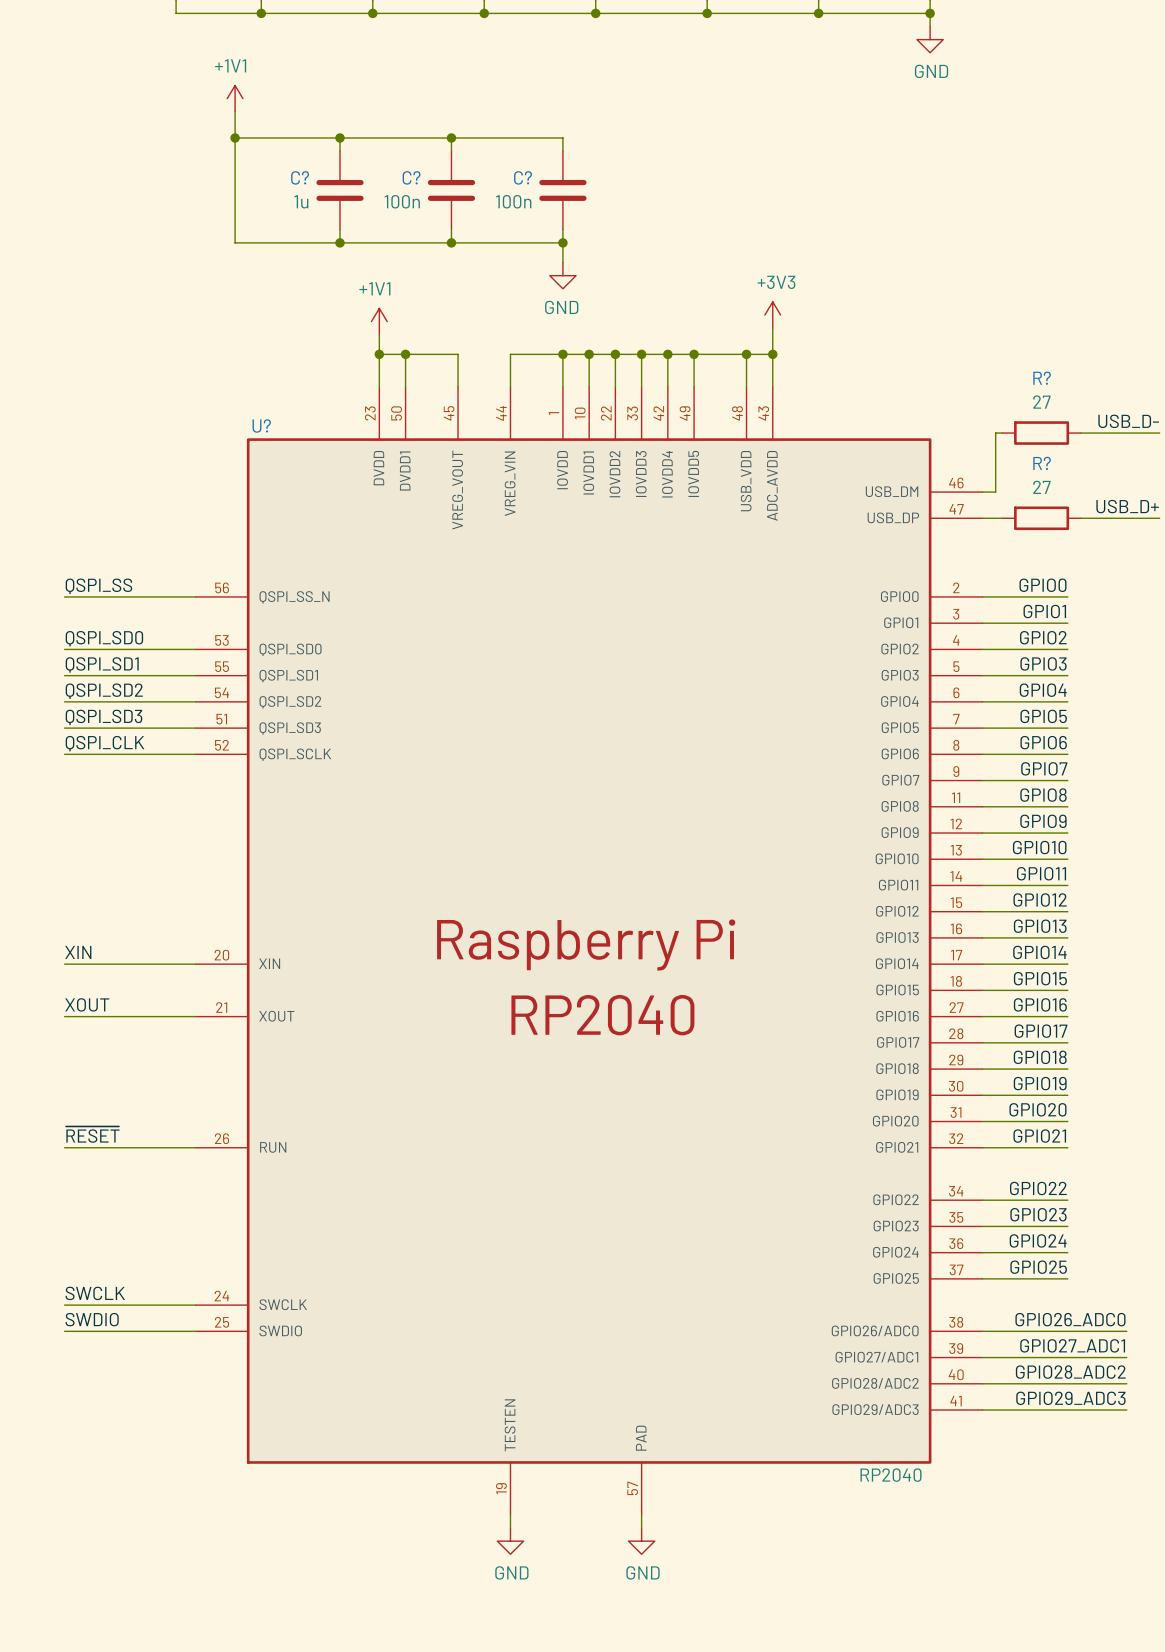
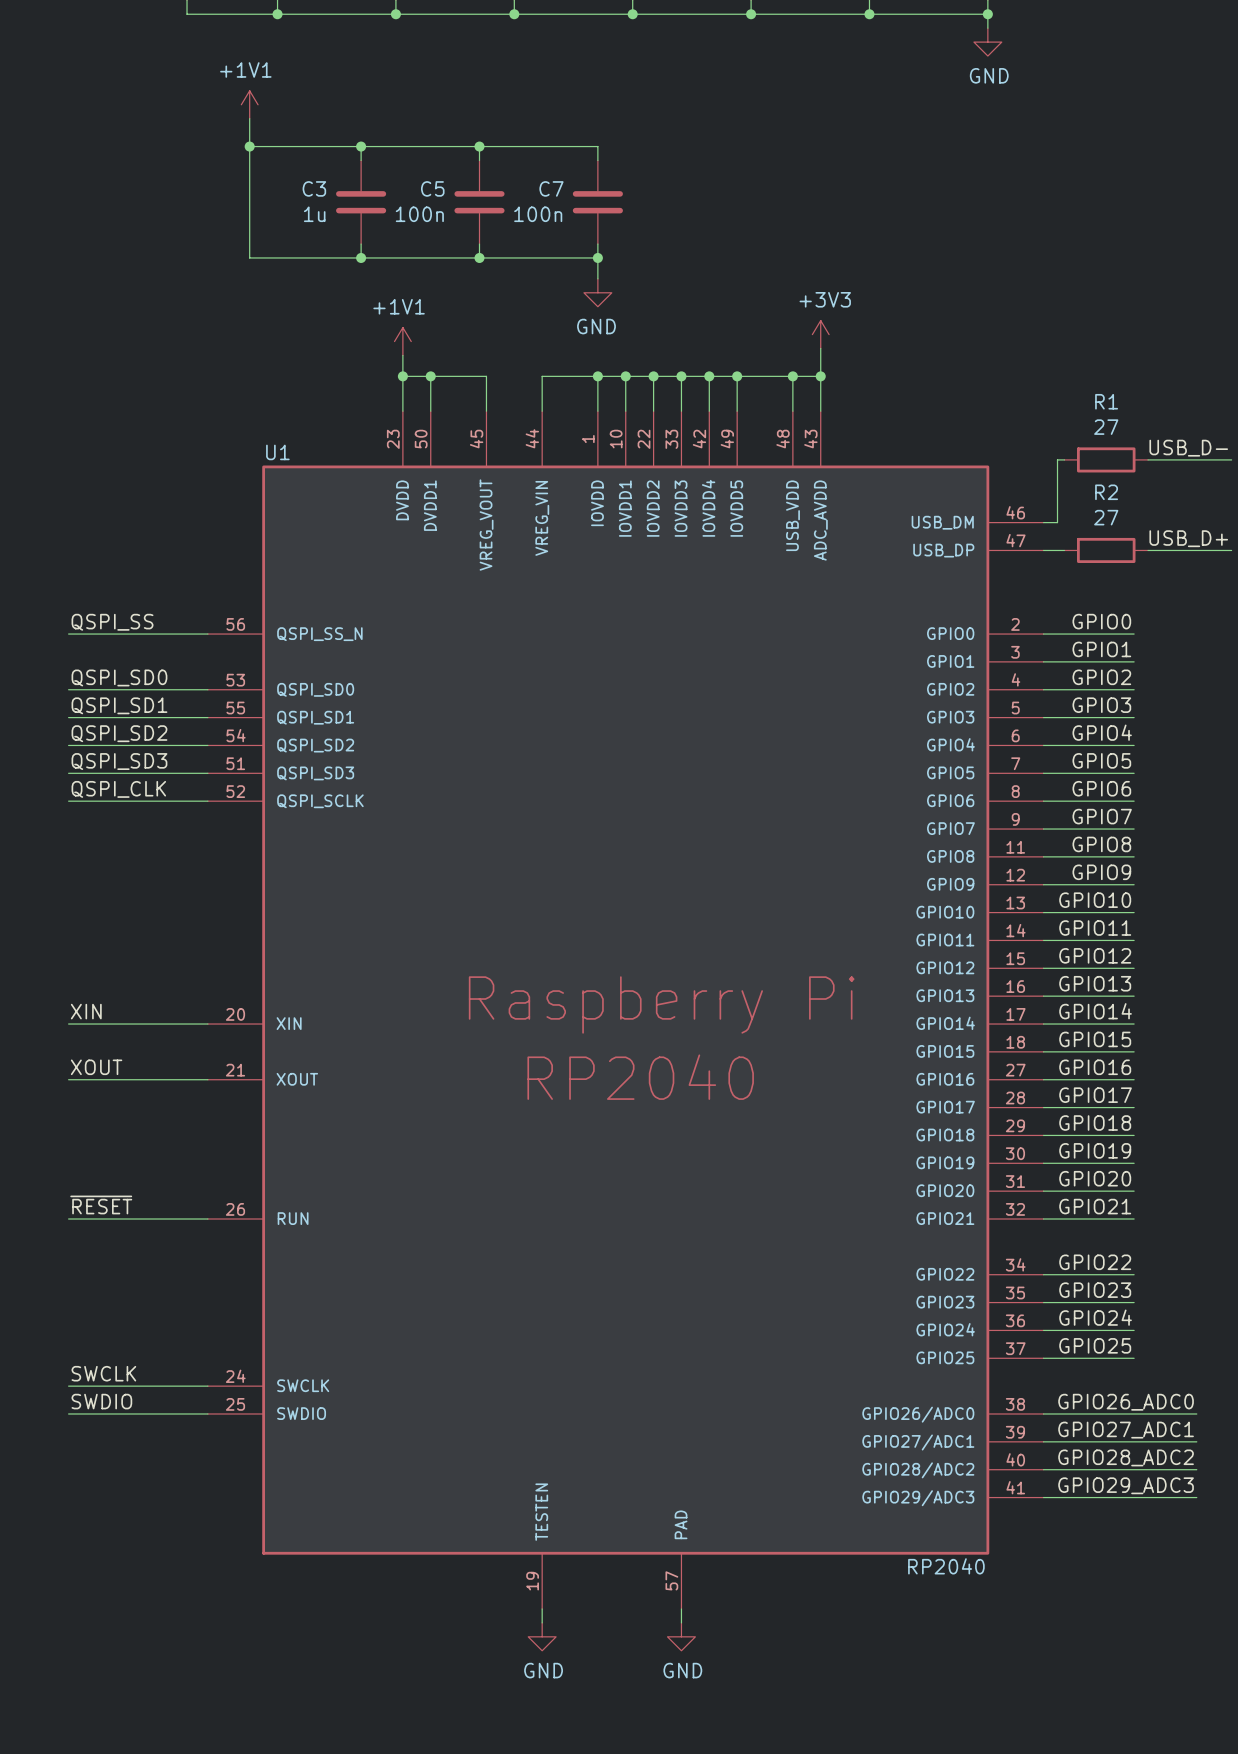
C? name: C? (300, 177) -> C3 (314, 188)
C? name: C? (411, 177) -> C5 (432, 188)
C? name: C? (523, 177) -> C7 (551, 188)
R? name: R? (1042, 378) -> R1 (1106, 401)
U? name: U? (261, 425) -> U1 (277, 452)
R? name: R? (1042, 463) -> R2 (1106, 492)

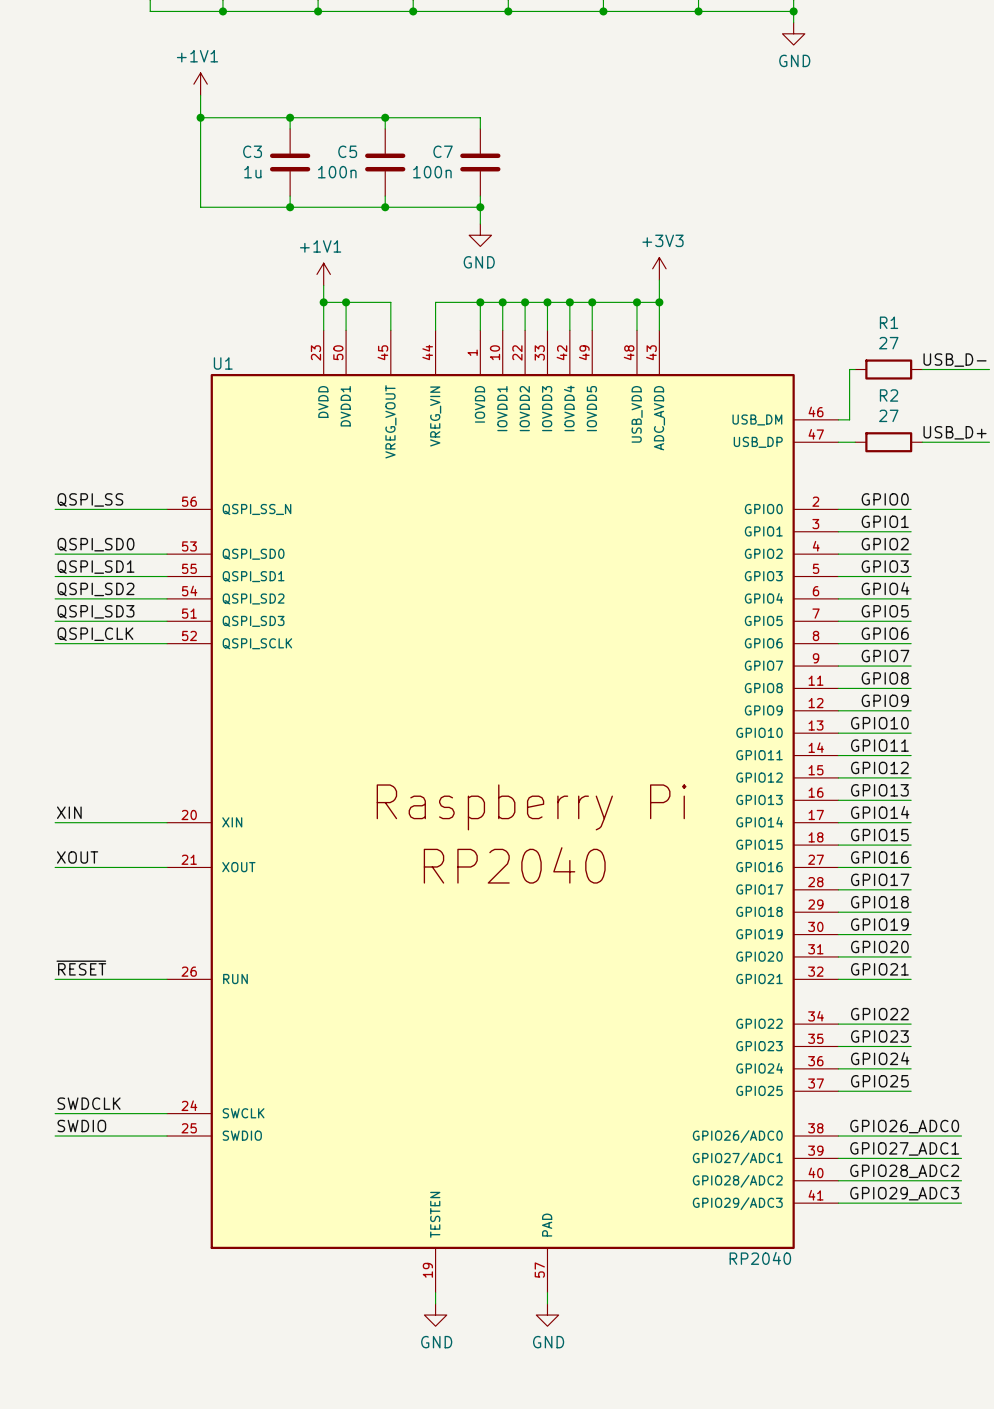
label: SWCLK (103, 1373) -> SWDCLK (89, 1103)

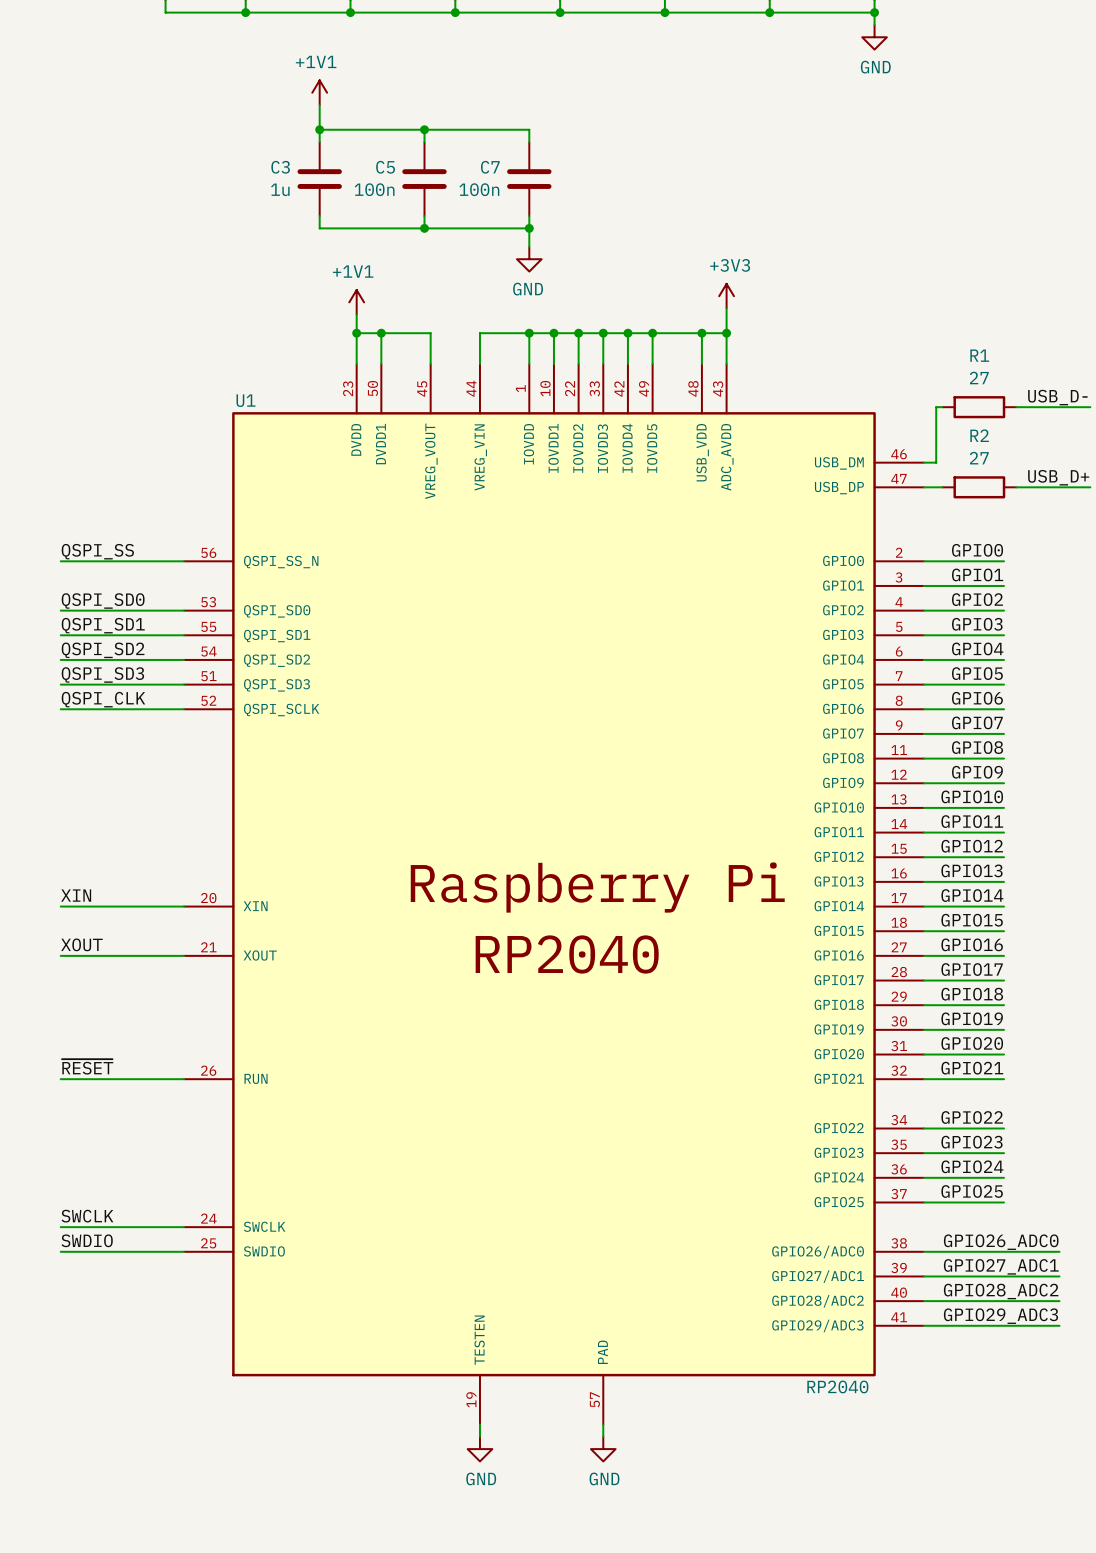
power symbol position: +1V1 (200, 84) -> +1V1 (319, 92)
wire: (200, 95) (200, 207) (290, 207) -> none
wire: (200, 117) (290, 117) -> (319, 105) (319, 129)
junction: (200, 117) -> none
junction: (290, 207) -> none
label: SWDCLK (89, 1103) -> SWCLK (87, 1216)

